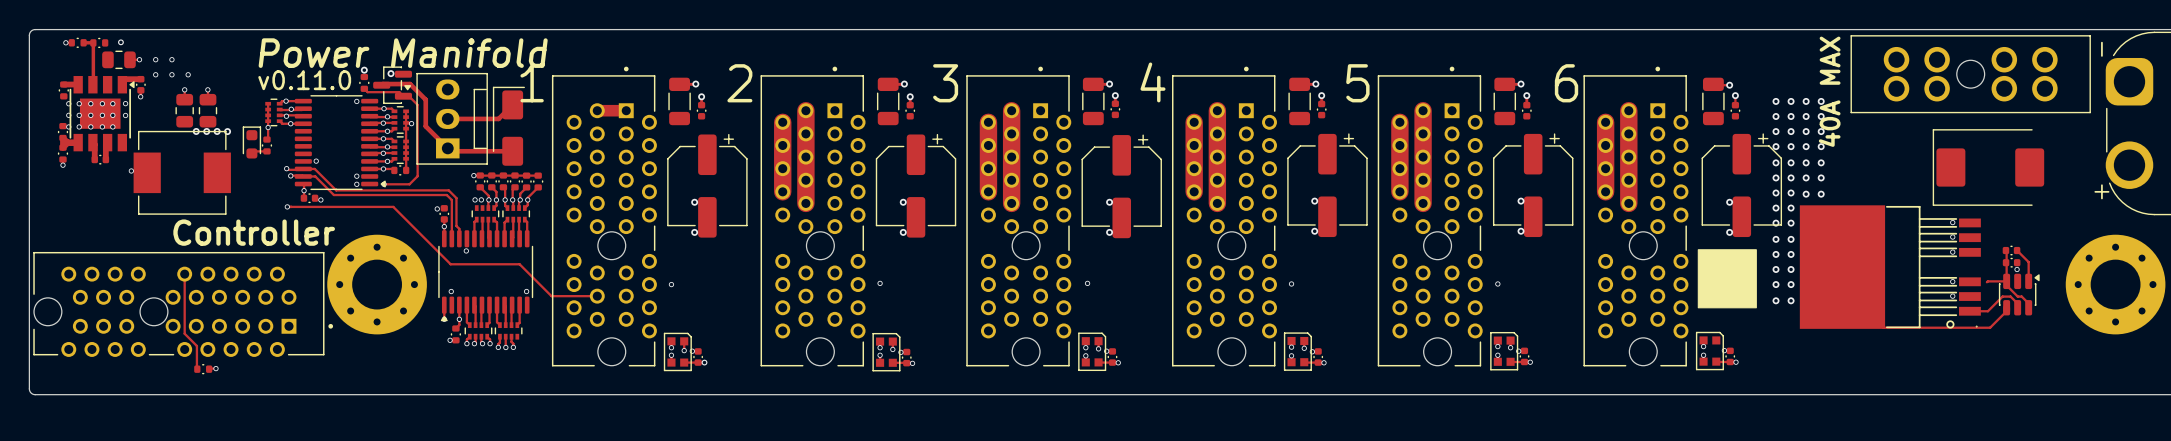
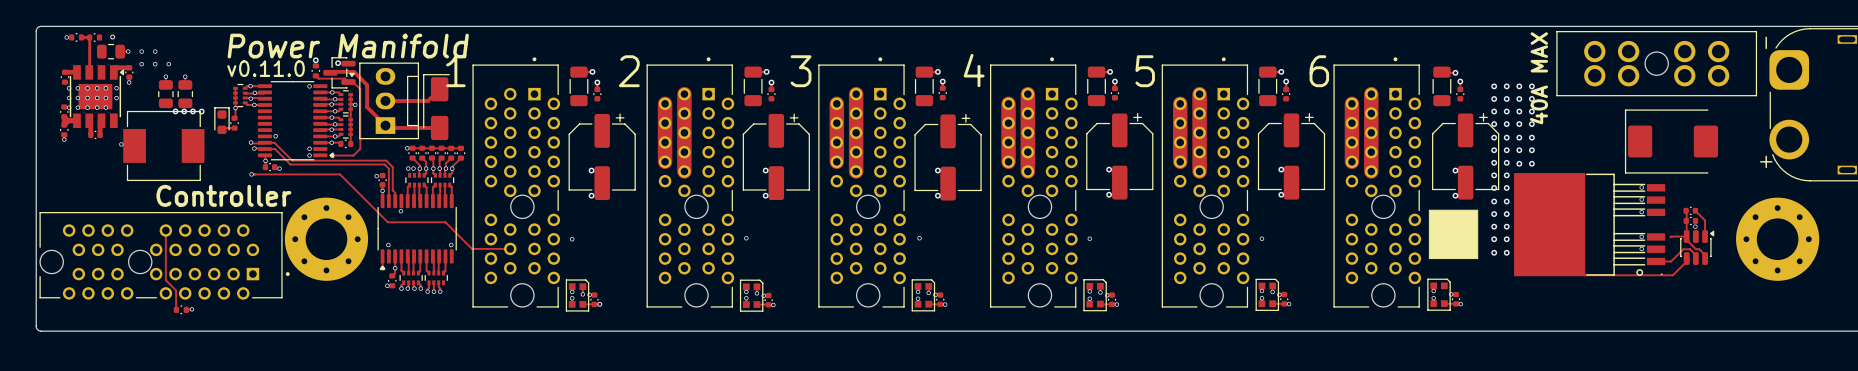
track: (597, 110) (626, 110) -> none

